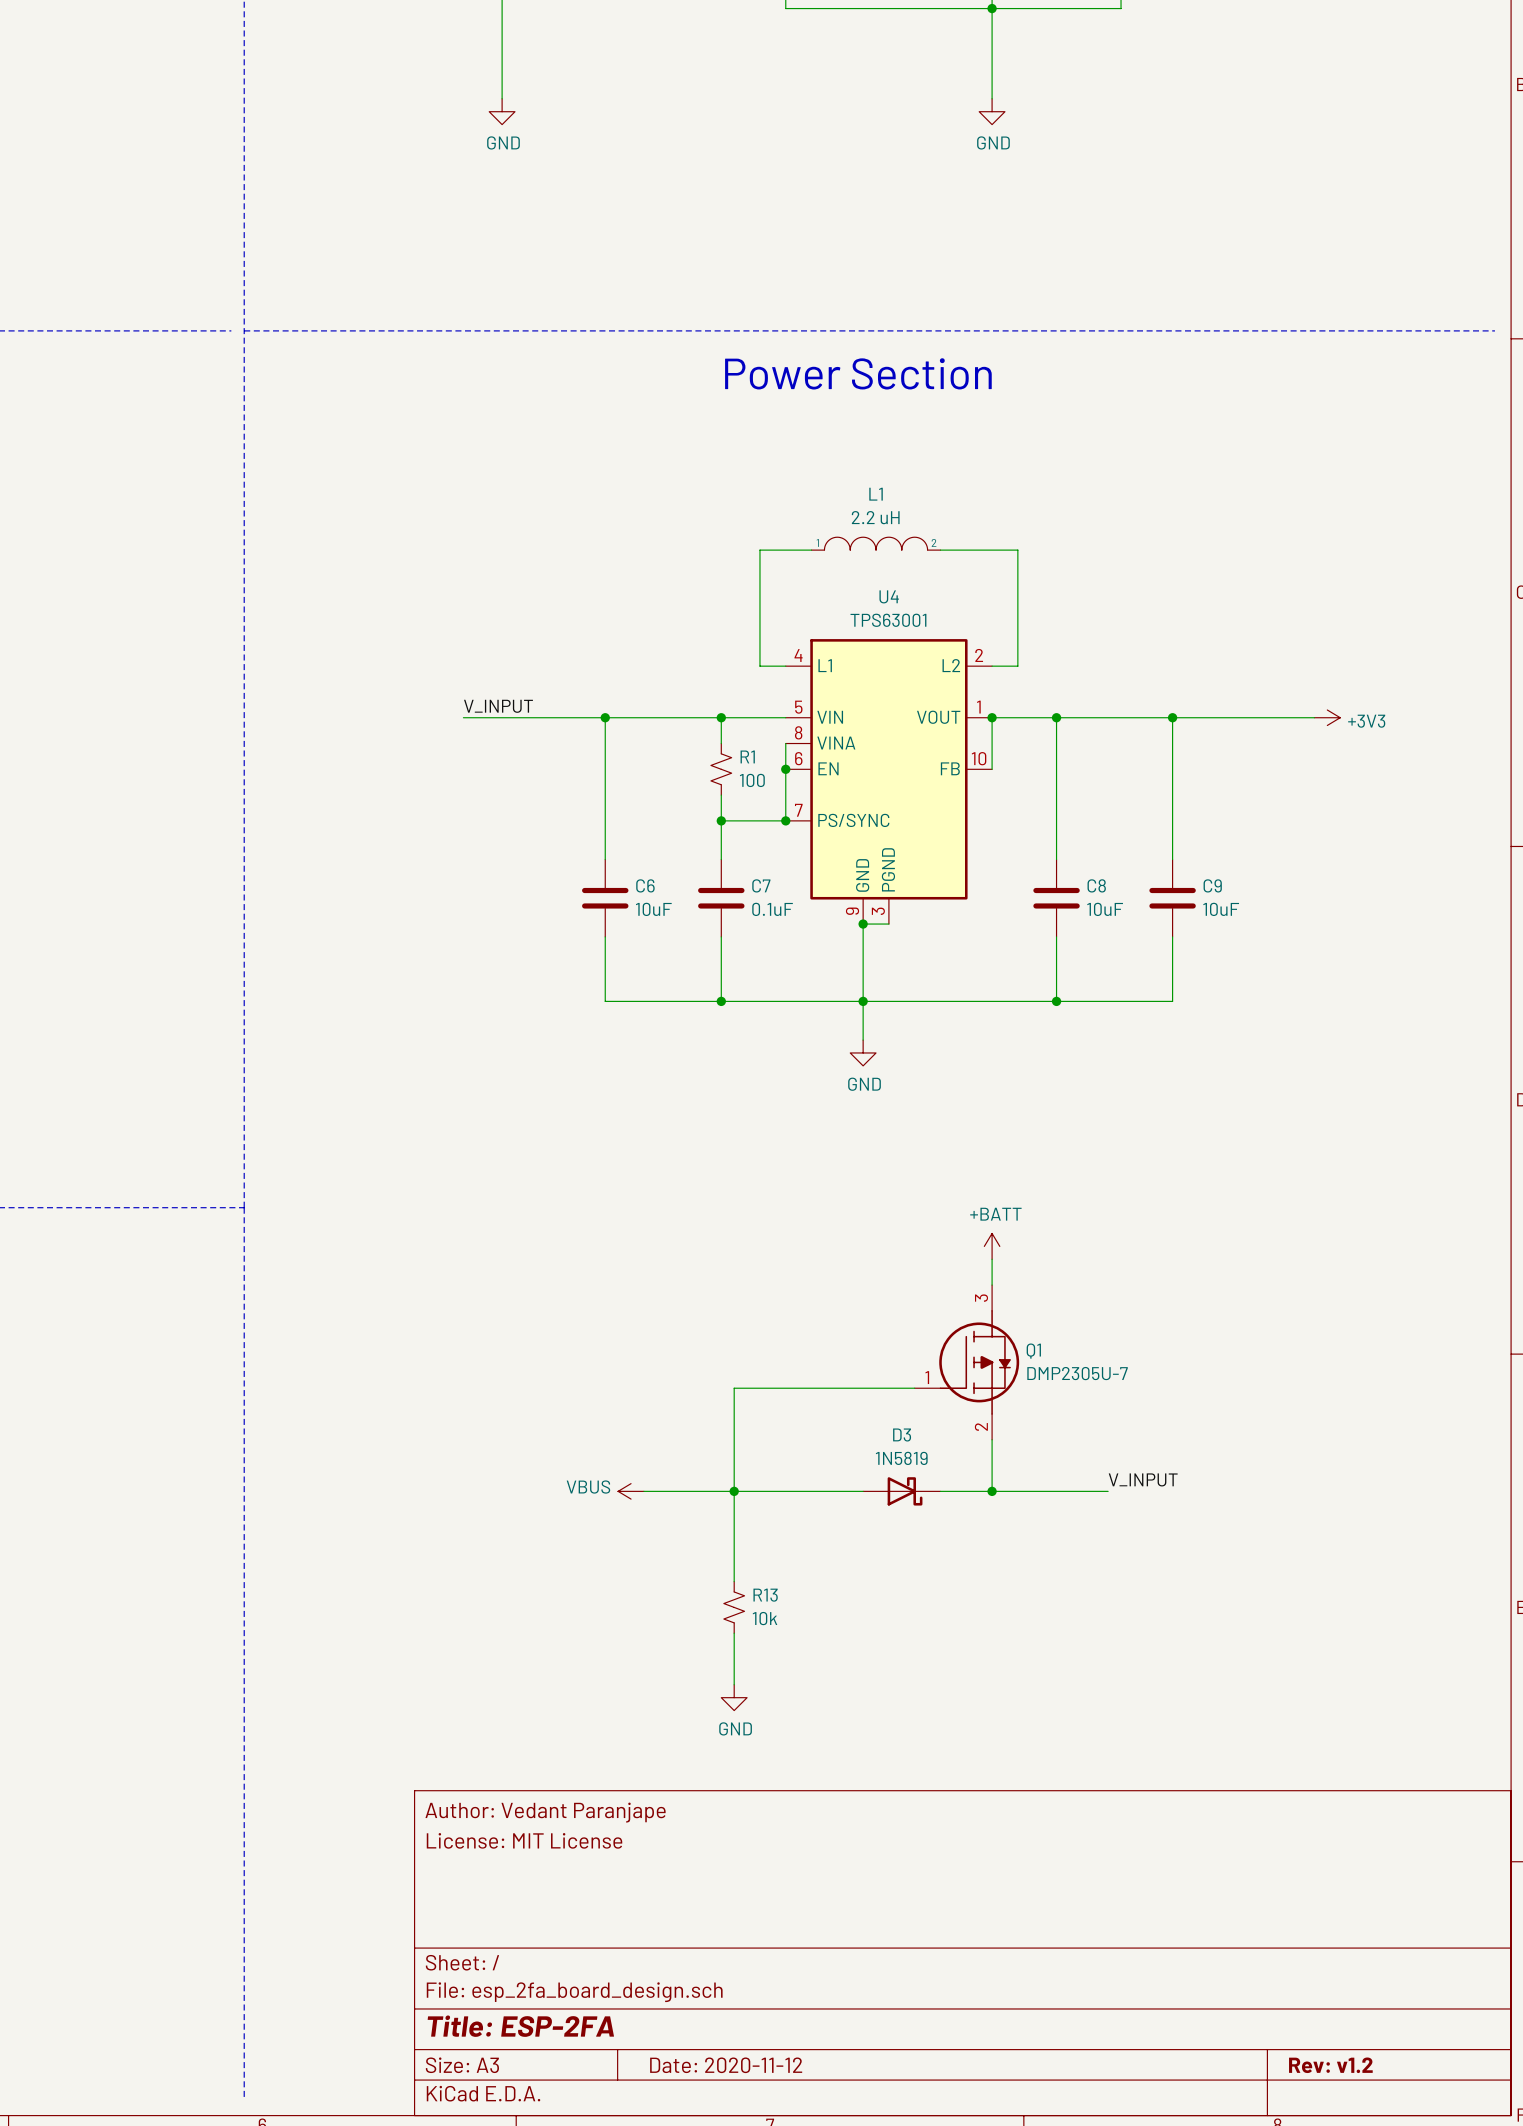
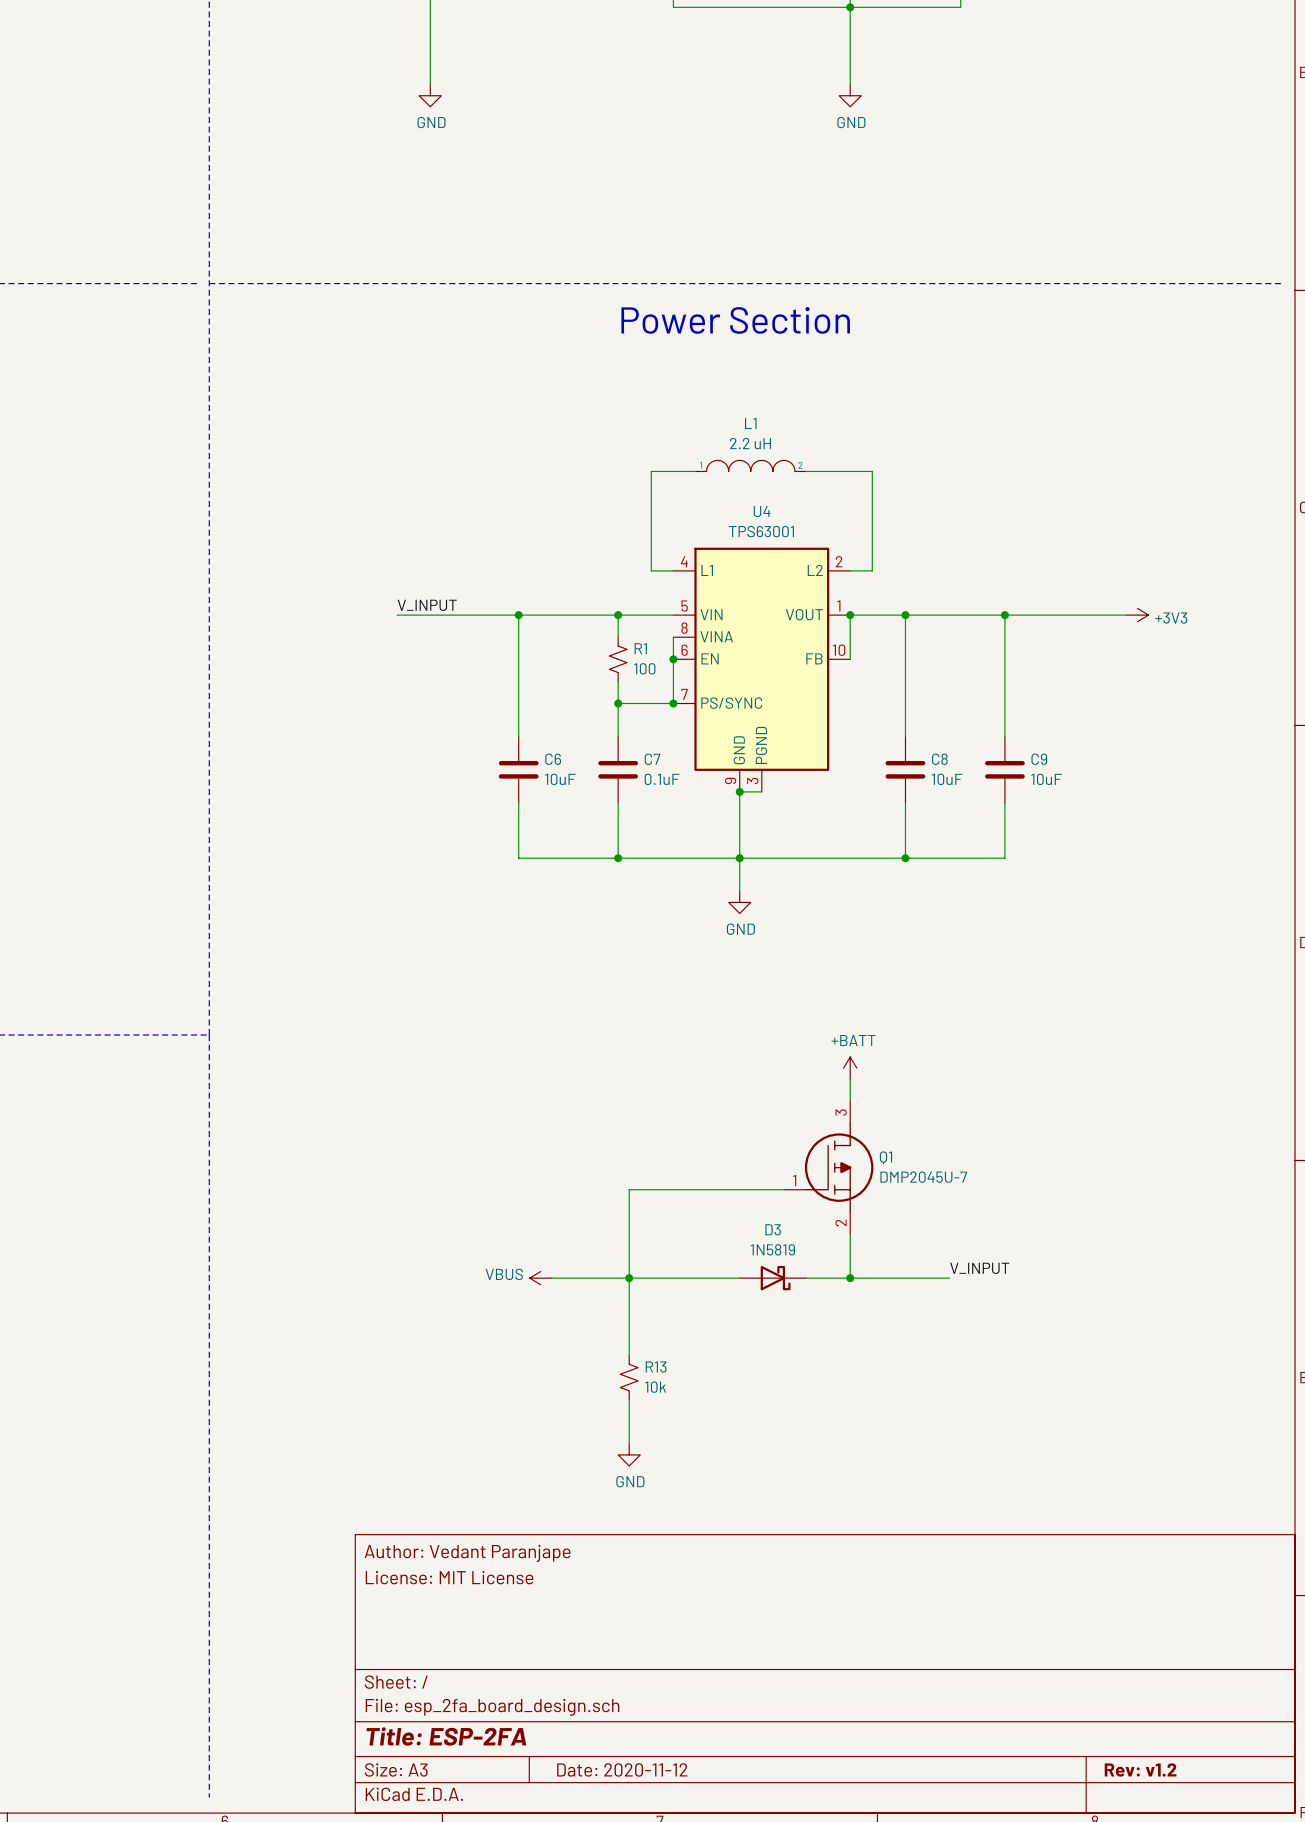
Q1 symbol: [914, 1285, 1020, 1440] -> [783, 1101, 874, 1234]
Q1 value: DMP2305U-7 (1077, 1373) -> DMP2045U-7 (923, 1177)

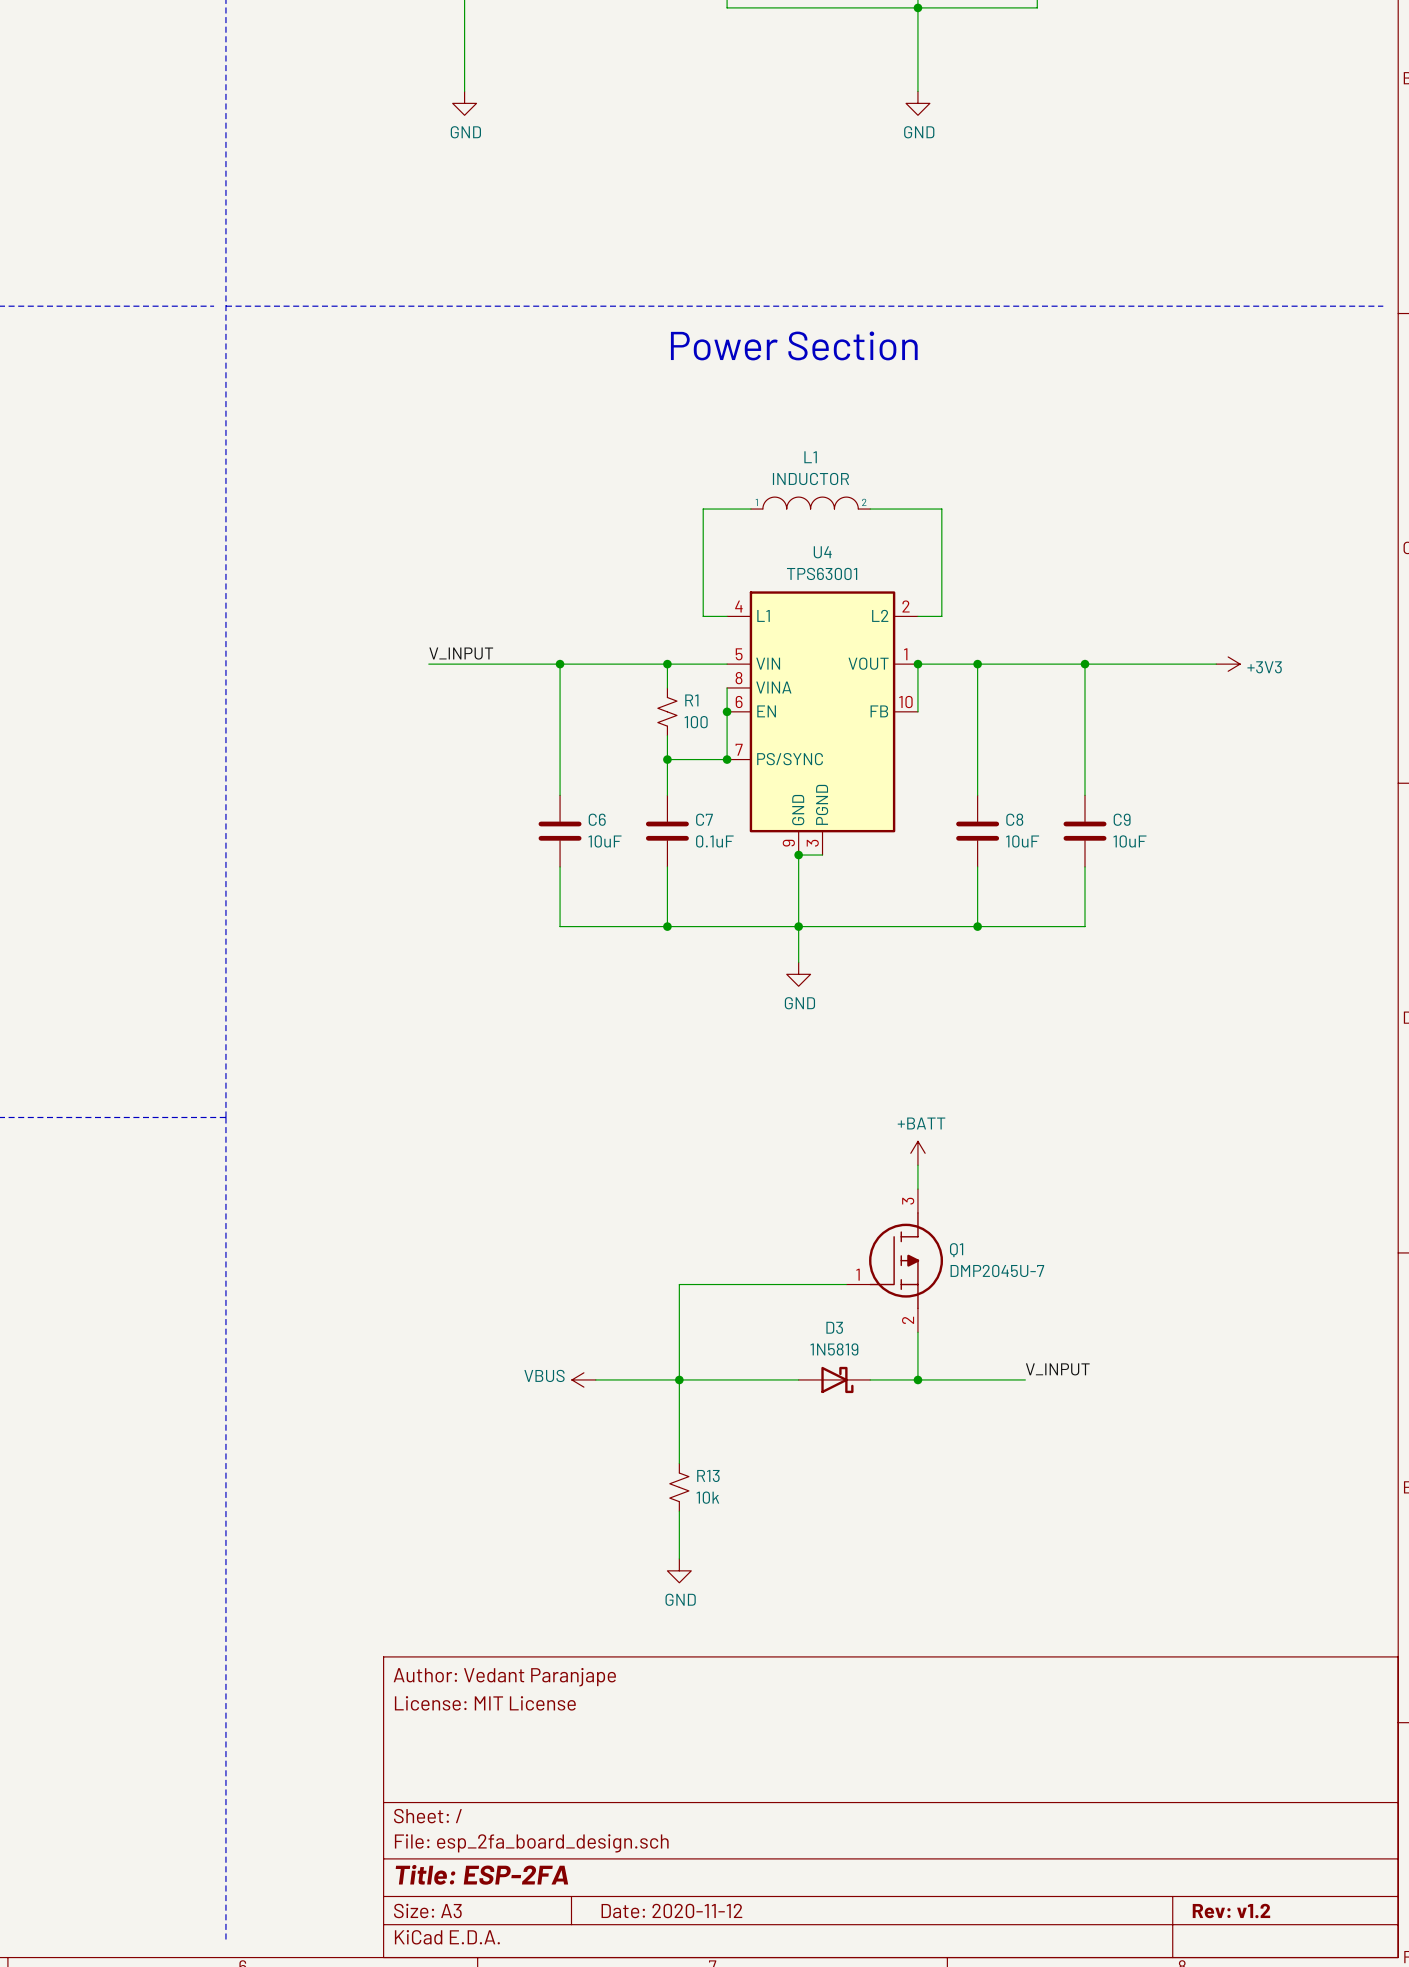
L1 value: 2.2 uH (750, 443) -> INDUCTOR (810, 478)

